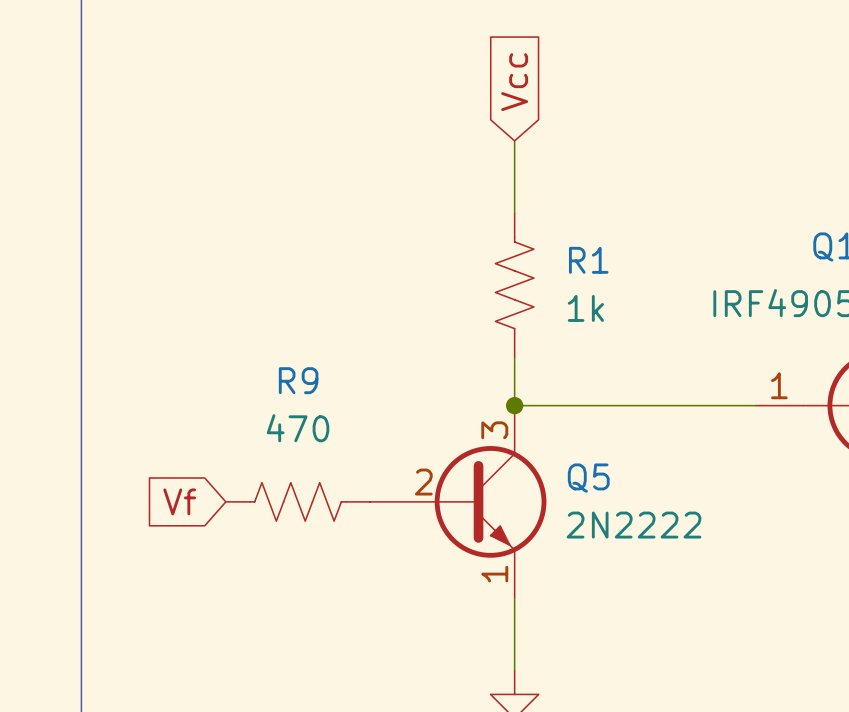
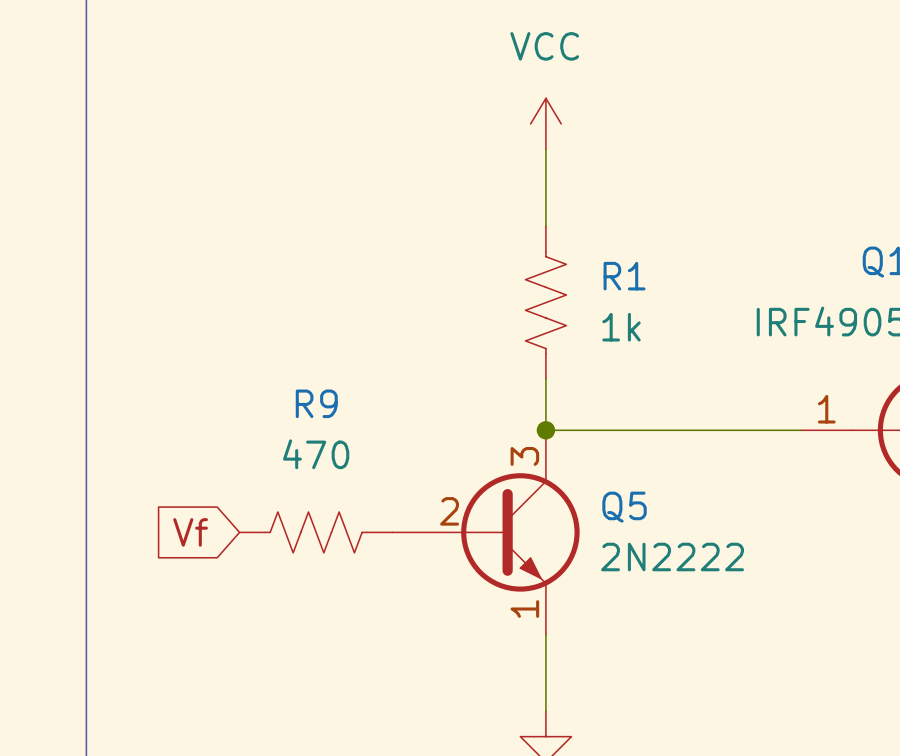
global label: Vcc (514, 82) -> none
power symbol: none -> VCC (545, 123)

